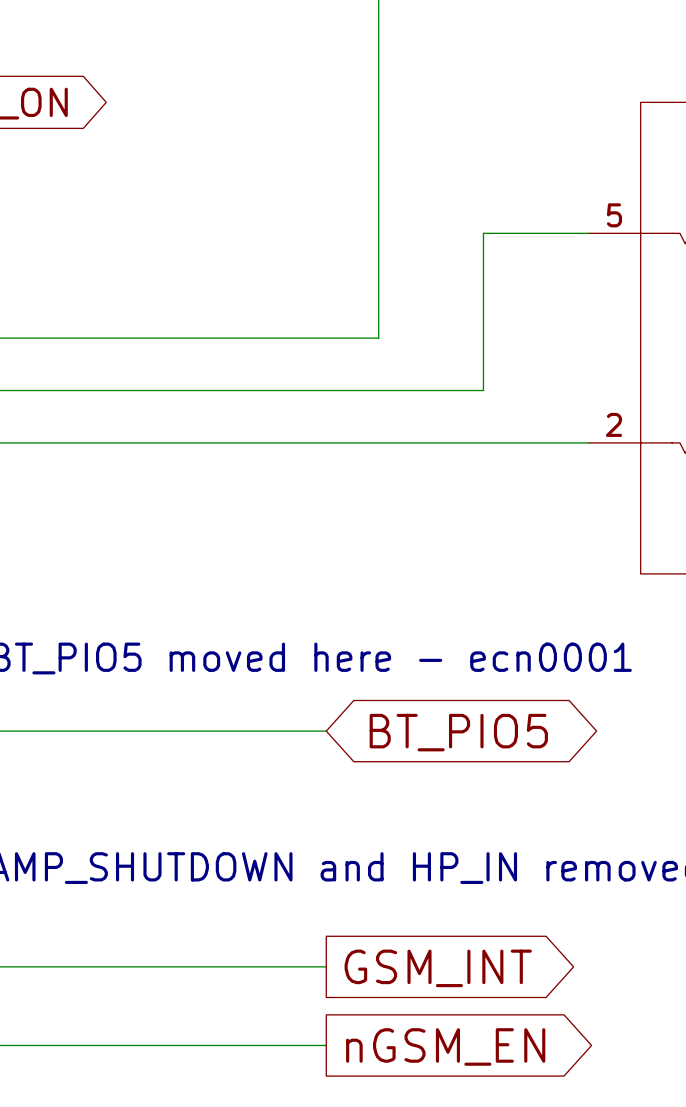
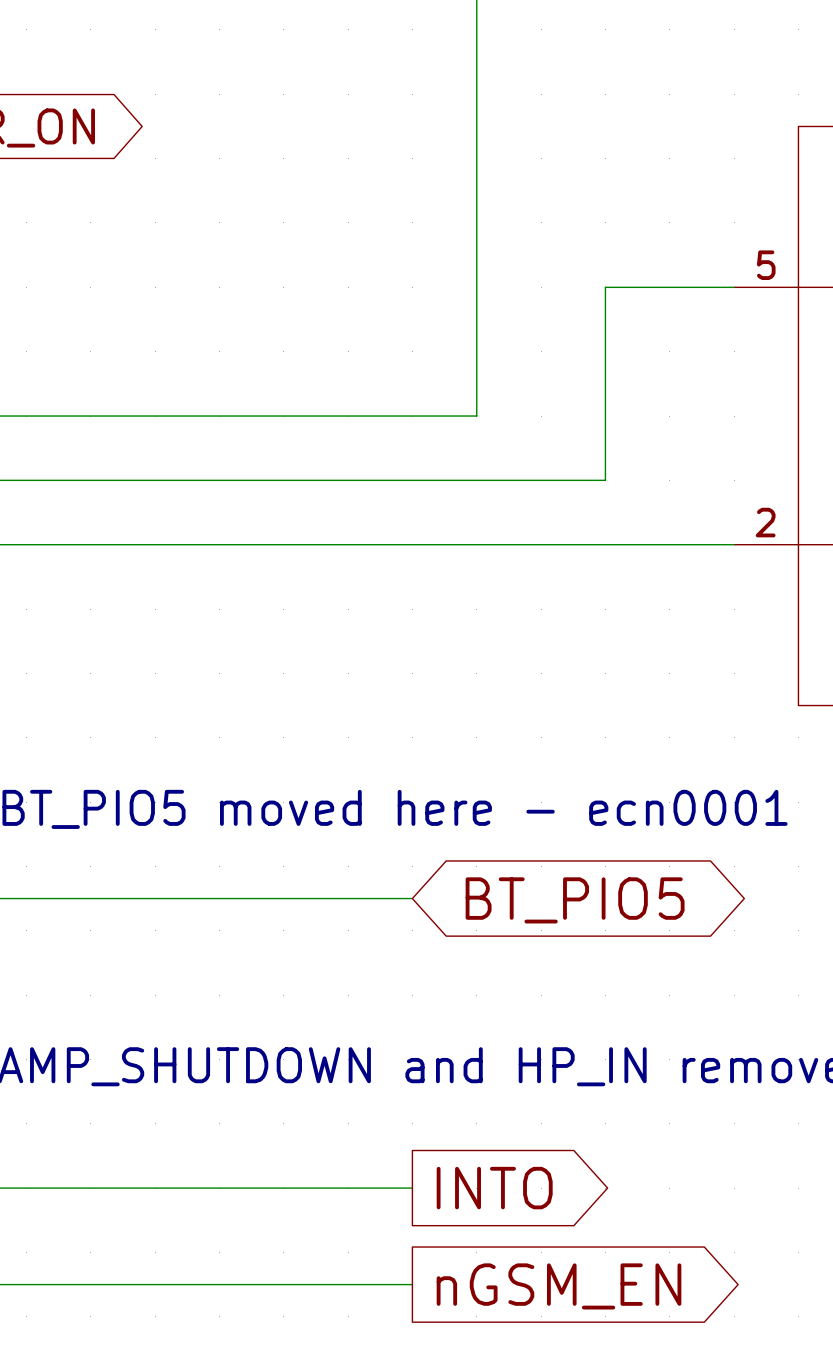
global label: GSM_INT (438, 968) -> INTO (494, 1188)

